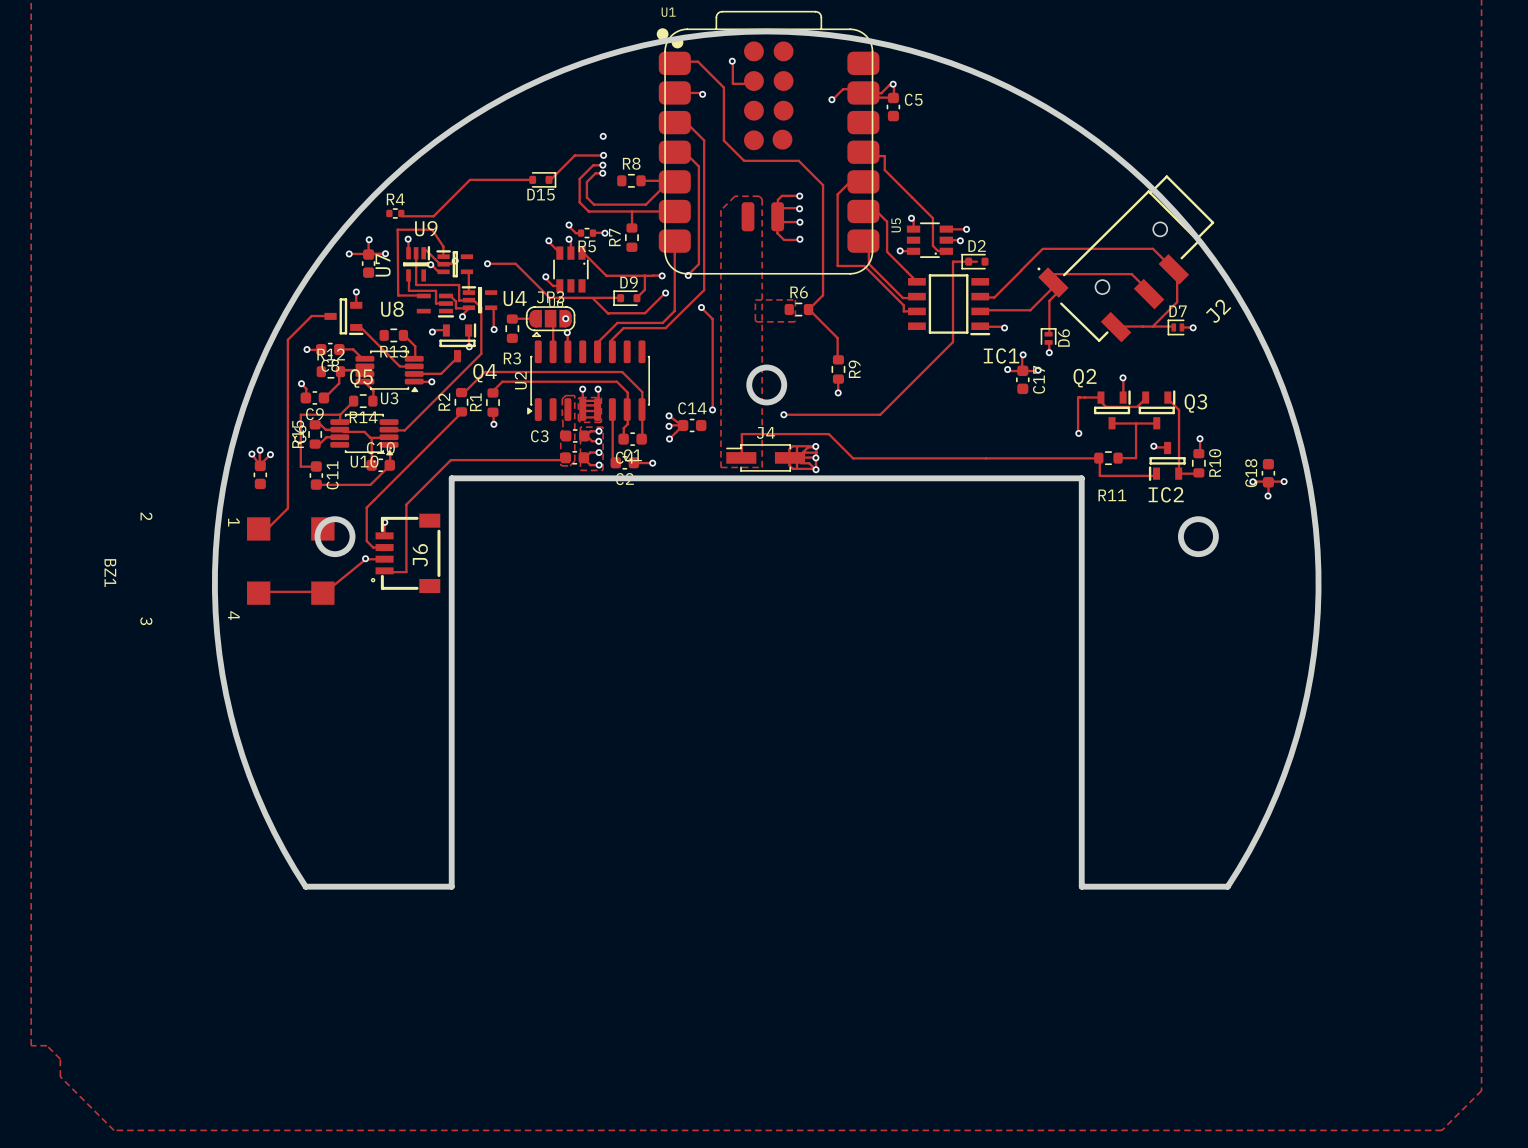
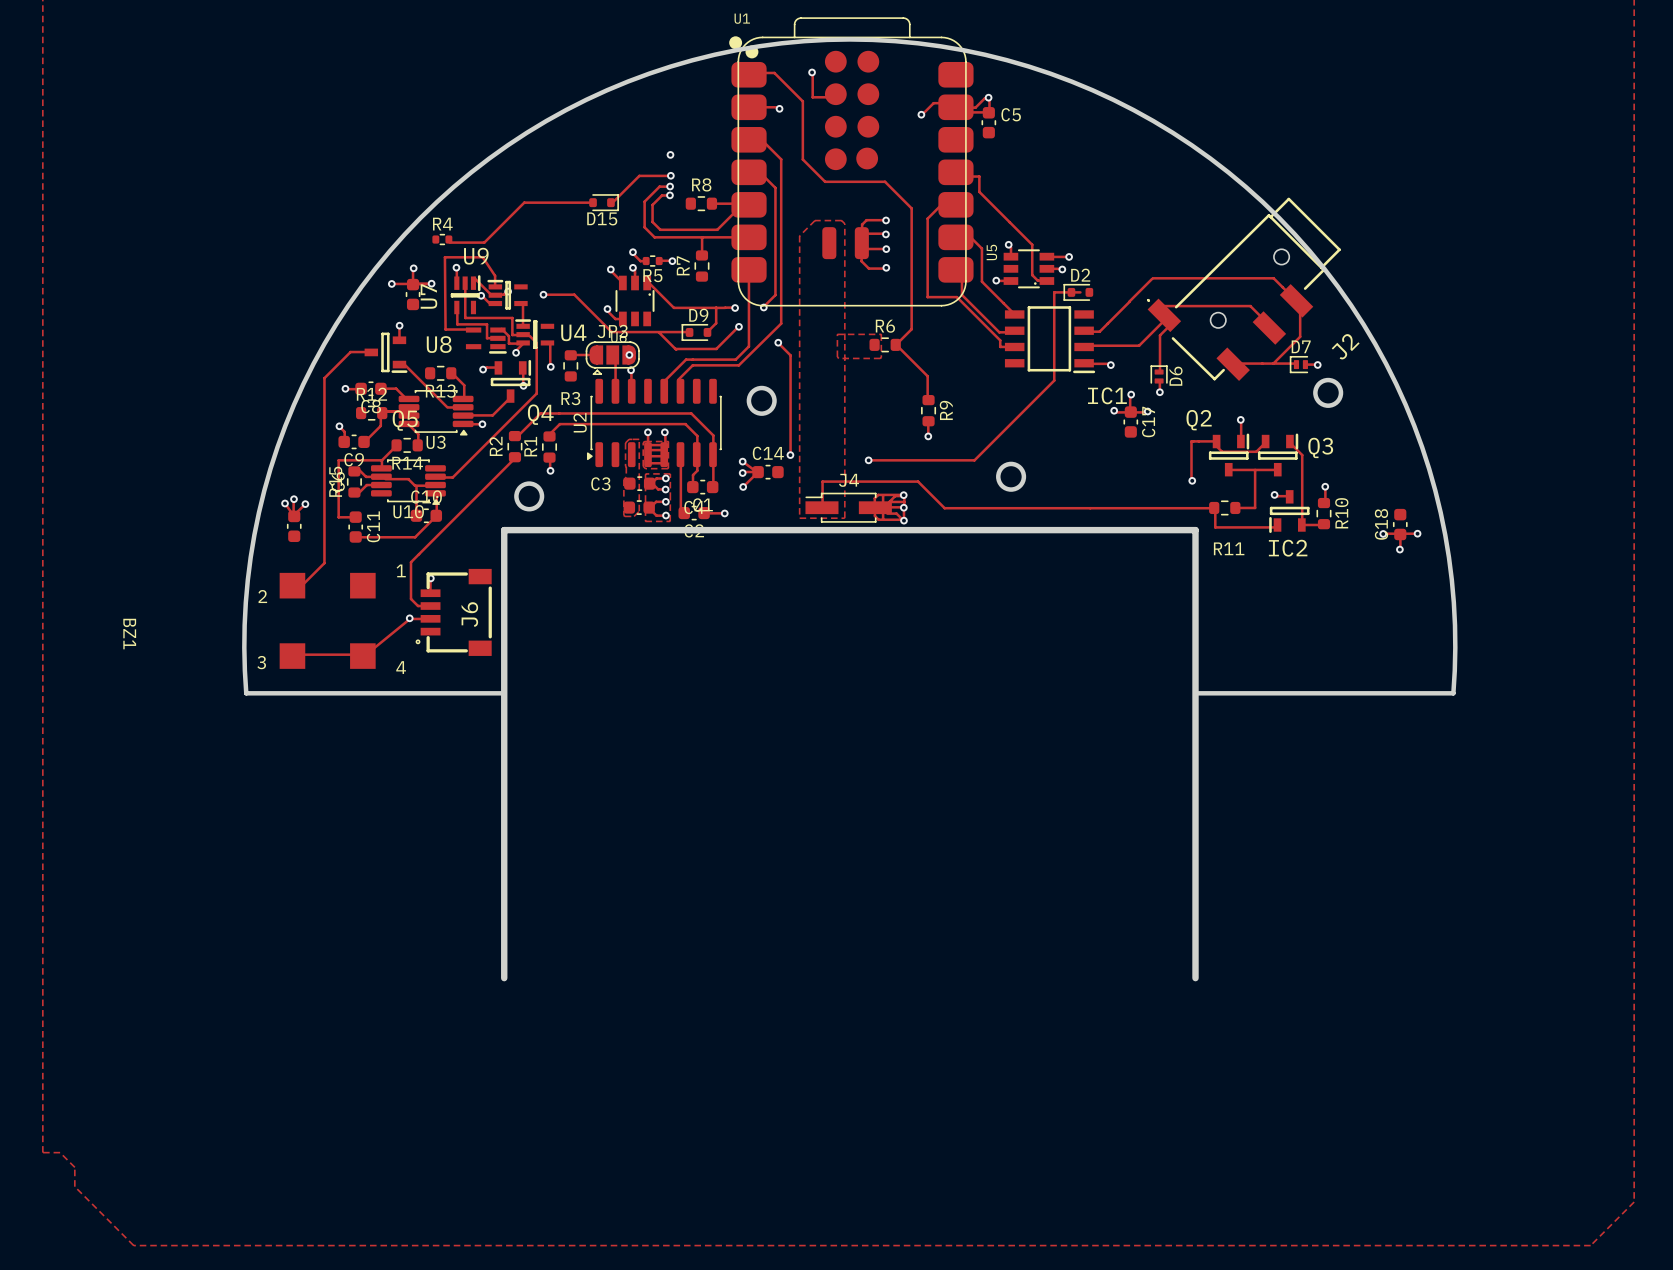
round board edge: none -> [1313, 377, 1344, 408]
round board edge: none -> [746, 385, 777, 416]
round board edge: [746, 364, 788, 406] -> none
round board edge: none -> [996, 461, 1027, 492]
round board edge: none -> [514, 481, 545, 512]
track: (561, 460) (450, 460) (406, 504) (406, 572) (383, 572) -> none
BZ1 text rotation: 0° (146, 516) -> 90° counterclockwise (262, 596)
BZ1 text position: 2 (146, 516) -> 2 (262, 596)
round board edge: [314, 516, 356, 558] -> none
round board edge: [1178, 516, 1219, 558] -> none
BZ1 text rotation: 0° (233, 522) -> 90° counterclockwise (401, 570)
BZ1 text position: 1 (233, 522) -> 1 (401, 570)
BZ1 text rotation: 0° (233, 615) -> 90° counterclockwise (401, 667)
BZ1 text position: 4 (233, 615) -> 4 (401, 667)
BZ1 text rotation: 0° (146, 621) -> 90° counterclockwise (261, 662)
BZ1 text position: 3 (146, 621) -> 3 (261, 662)
board edge: none -> (504, 693) (246, 693) (244, 625) (247, 579) (254, 534) (264, 490) (277, 447) (293, 404) (313, 363) (336, 324) (361, 286) (404, 234) (436, 202) (471, 172) (526, 132) (586, 99) (627, 81) (670, 66) (714, 54) (759, 46) (804, 41) (849, 39) (895, 41) (940, 46) (984, 54) (1028, 66) (1071, 81) (1113, 99) (1172, 132) (1210, 158) (1245, 186) (1294, 234) (1338, 286) (1363, 324) (1386, 363) (1405, 404) (1422, 447) (1435, 490) (1445, 534) (1451, 579) (1455, 625) (1453, 693) (1195, 693)
board edge: (451, 886) (305, 886) (284, 851) (256, 794) (236, 735) (226, 695) (219, 654) (214, 591) (215, 550) (223, 488) (237, 427) (250, 387) (266, 349) (285, 312) (307, 276) (332, 243) (359, 211) (388, 181) (419, 154) (453, 129) (488, 106) (525, 87) (563, 70) (602, 56) (642, 45) (683, 37) (725, 33) (766, 31) (808, 33) (849, 37) (890, 45) (930, 56) (970, 70) (1008, 87) (1045, 106) (1080, 129) (1113, 154) (1145, 181) (1174, 211) (1201, 243) (1225, 276) (1247, 312) (1266, 349) (1282, 387) (1301, 447) (1310, 488) (1315, 529) (1318, 591) (1314, 654) (1307, 695) (1291, 755) (1276, 794) (1259, 832) (1227, 886) (1081, 886) -> none

